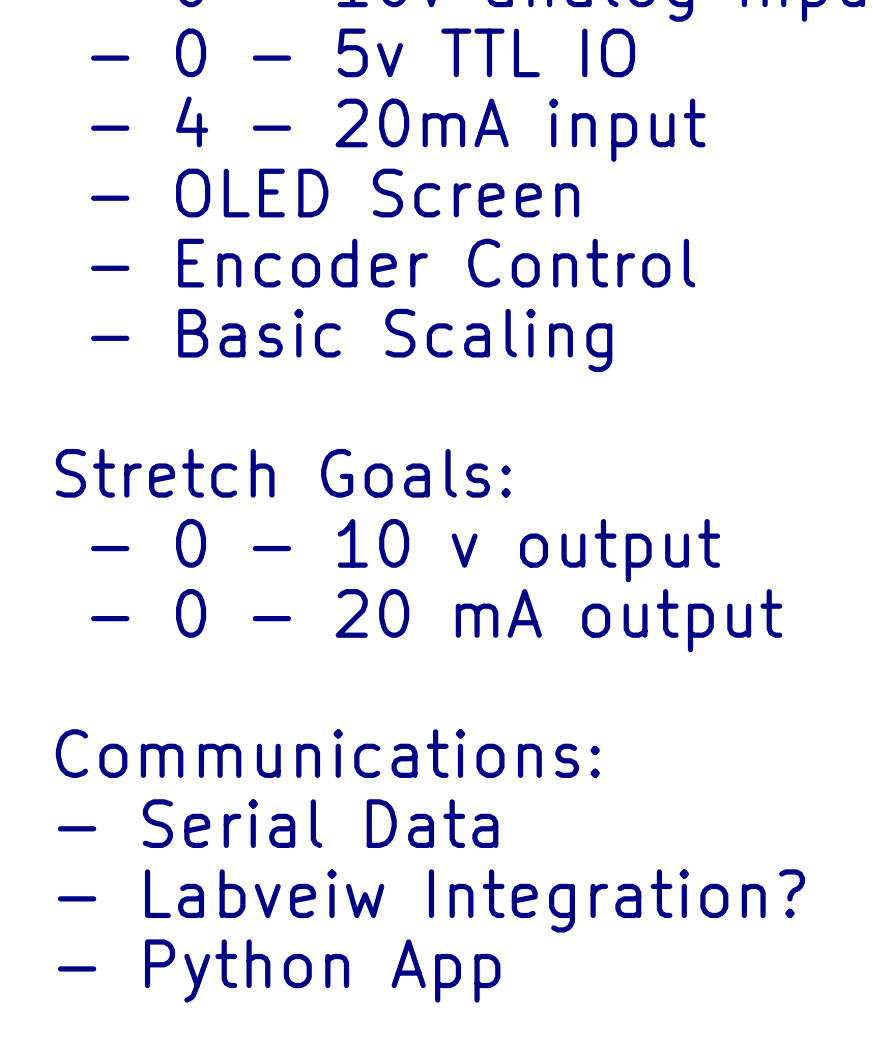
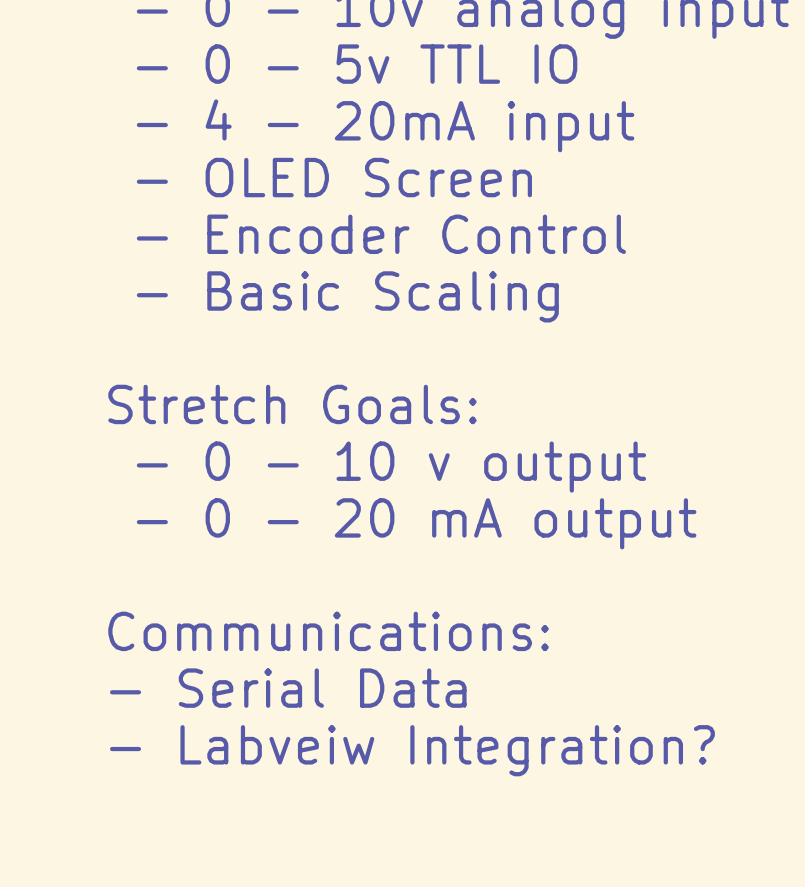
text: - Python App (279, 971) -> none

